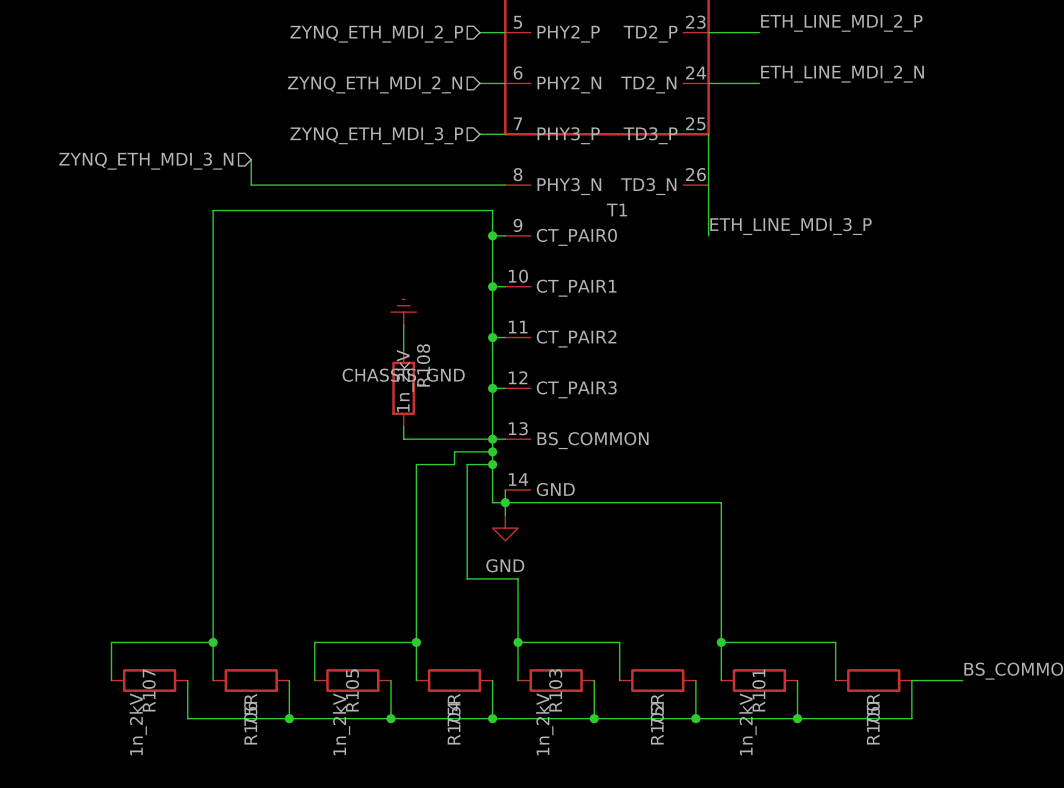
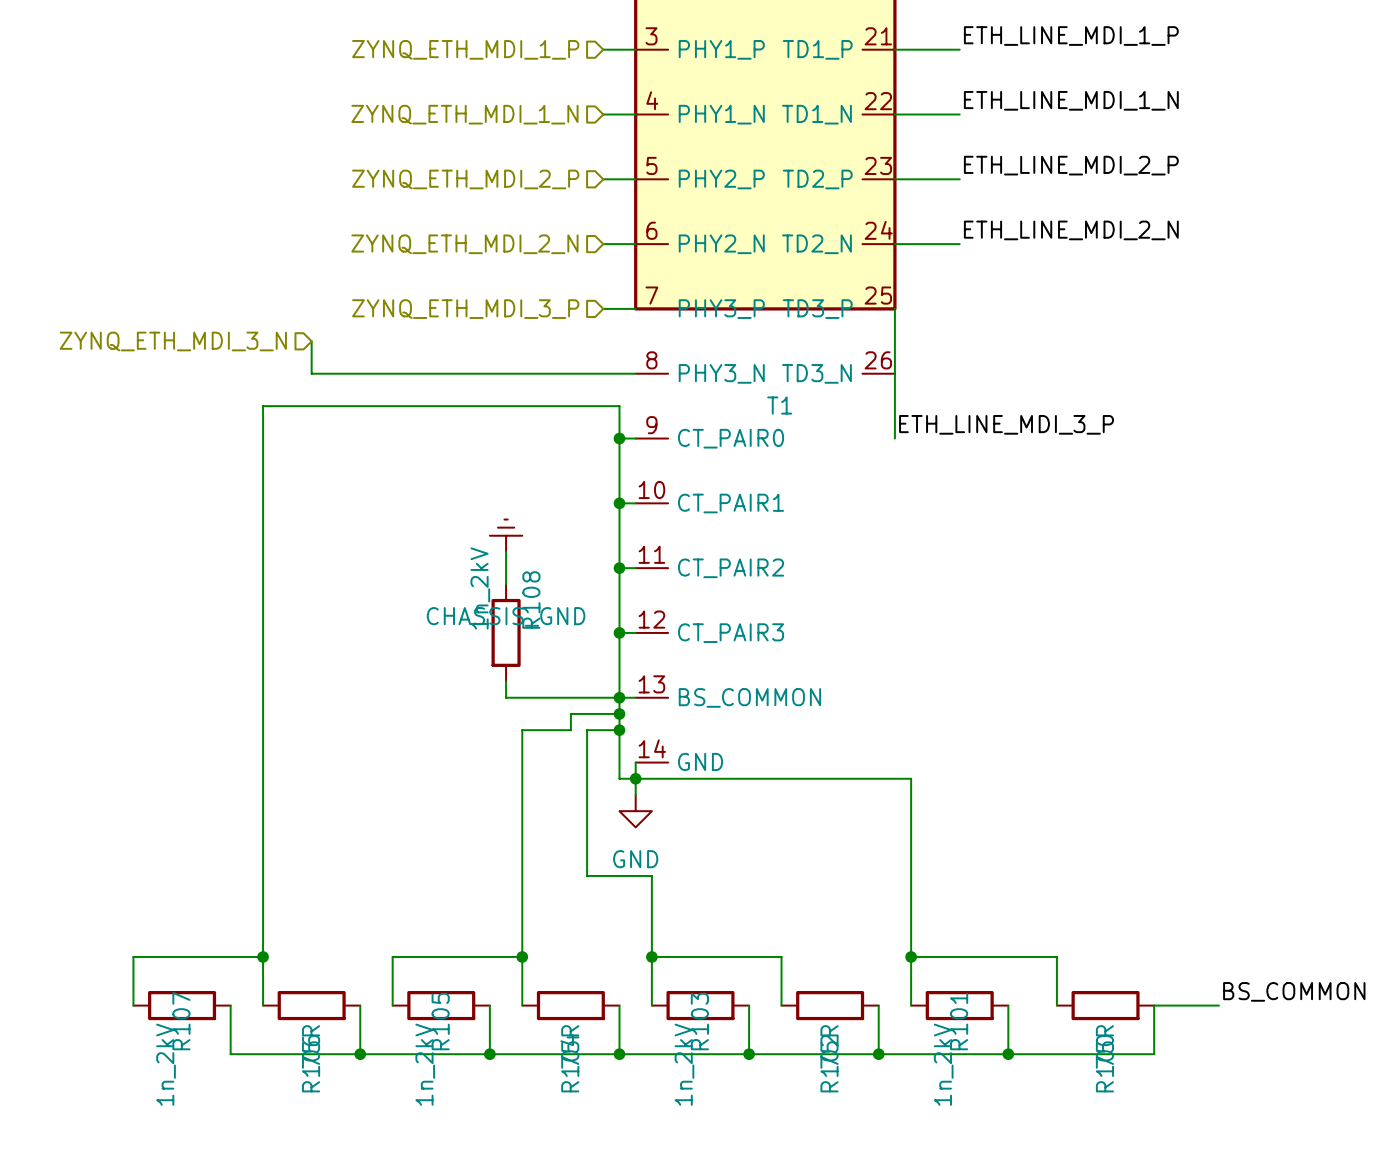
R108 value position: 1n_2kV (405, 380) -> 1n_2kV (480, 588)

